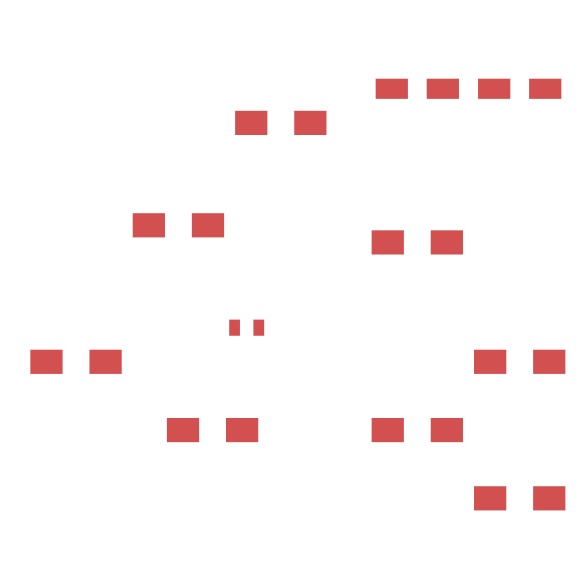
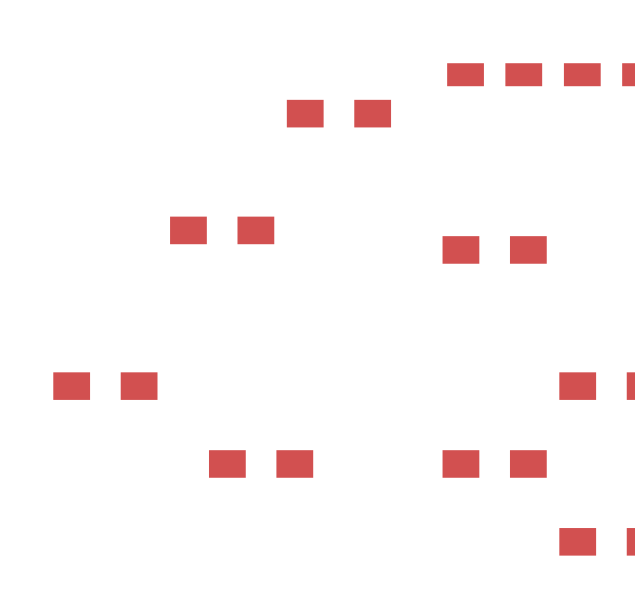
part: (246, 327) -> none

